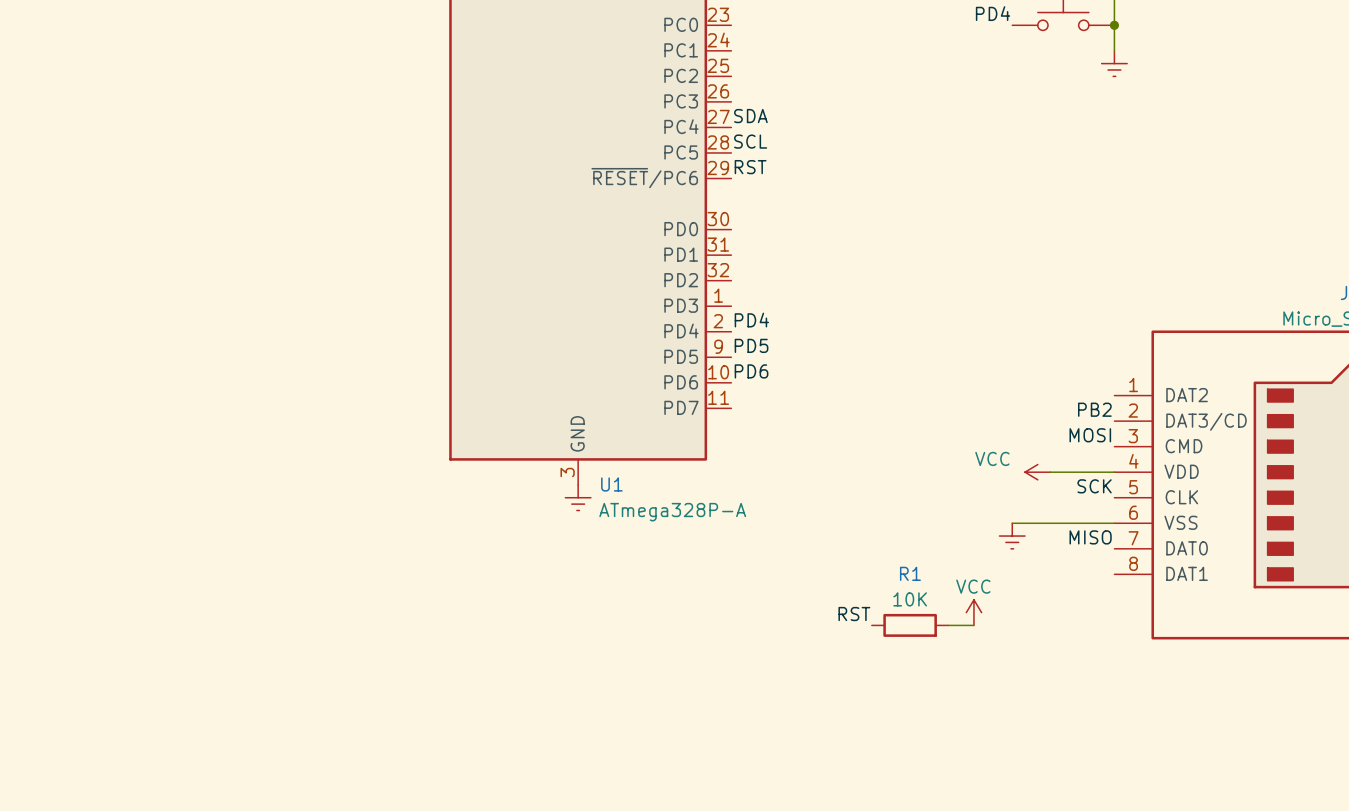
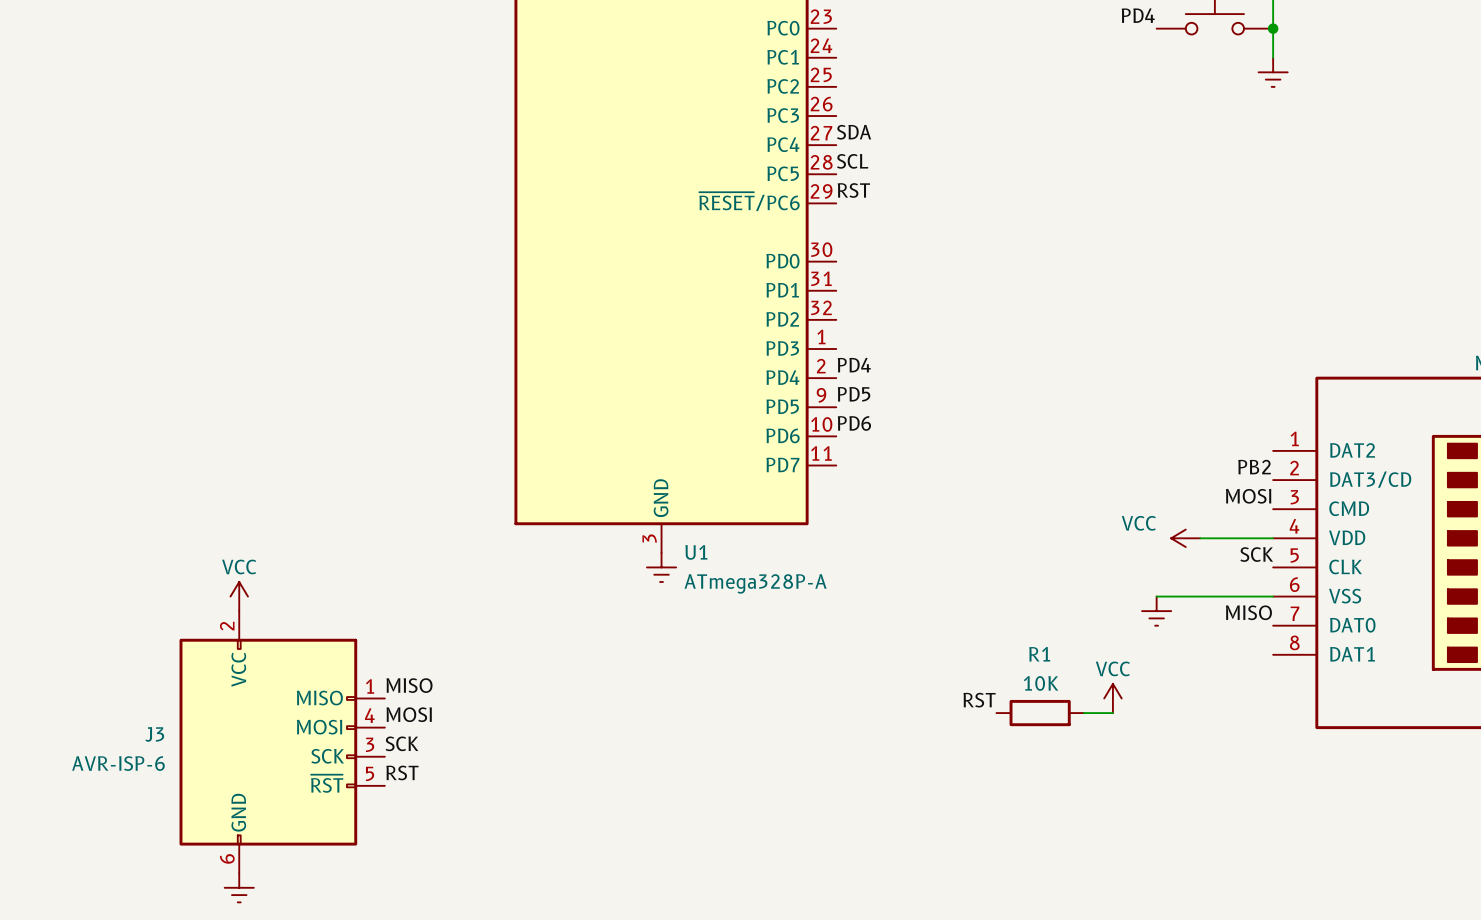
power symbol: none -> VCC (239, 596)
label: none -> MISO (409, 685)
label: none -> MOSI (409, 714)
J3: none -> AVR-ISP-6 (282, 742)
label: none -> SCK (401, 743)
label: none -> RST (402, 772)
power symbol: none -> (239, 887)

